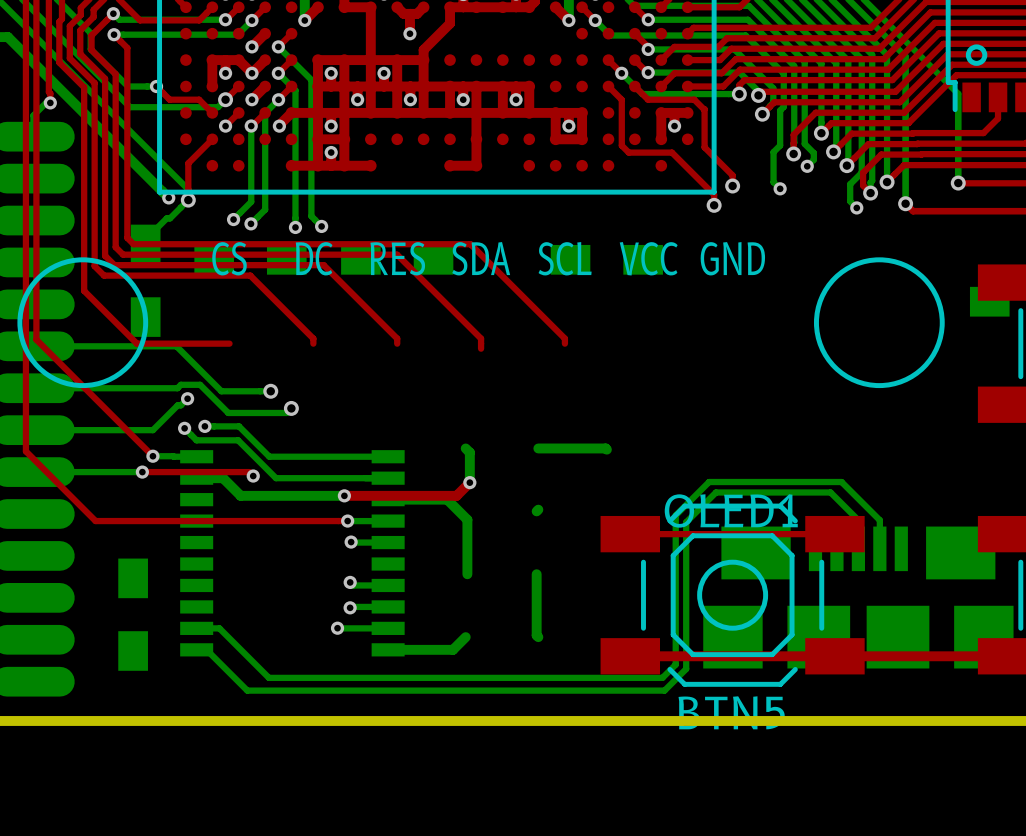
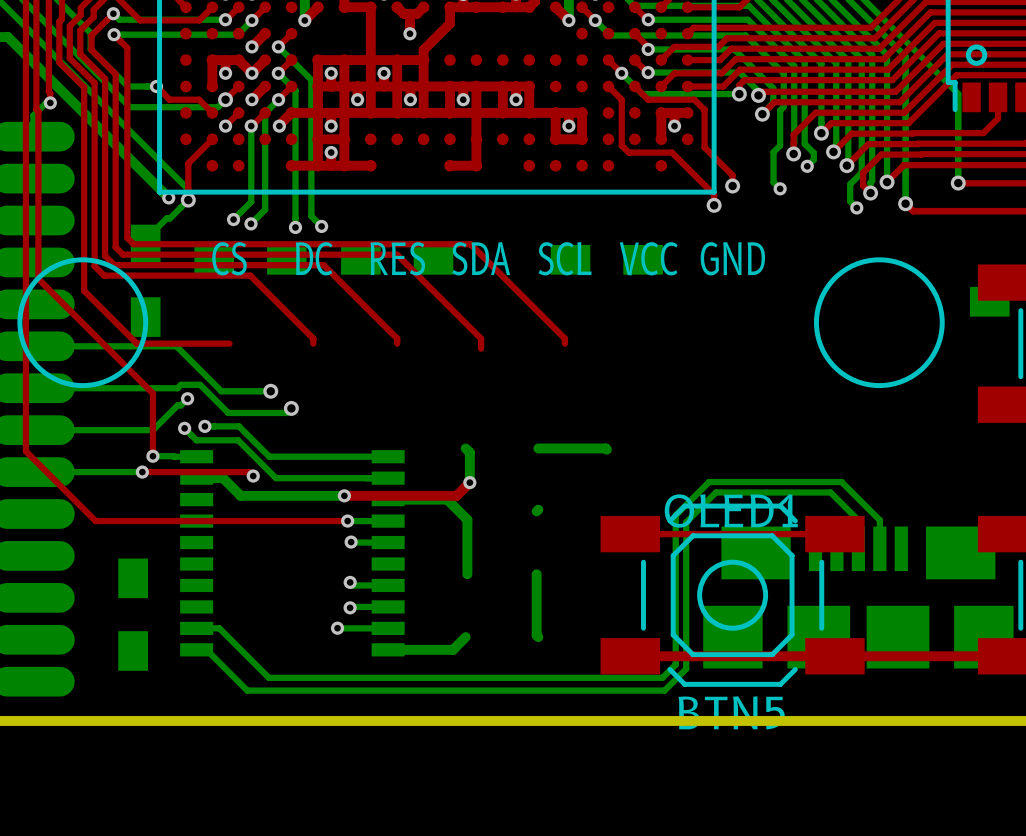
top track: (36, 109) (36, 339) (152, 456) -> (36, 109) (38, 111) (38, 278) (152, 393) (152, 456)

